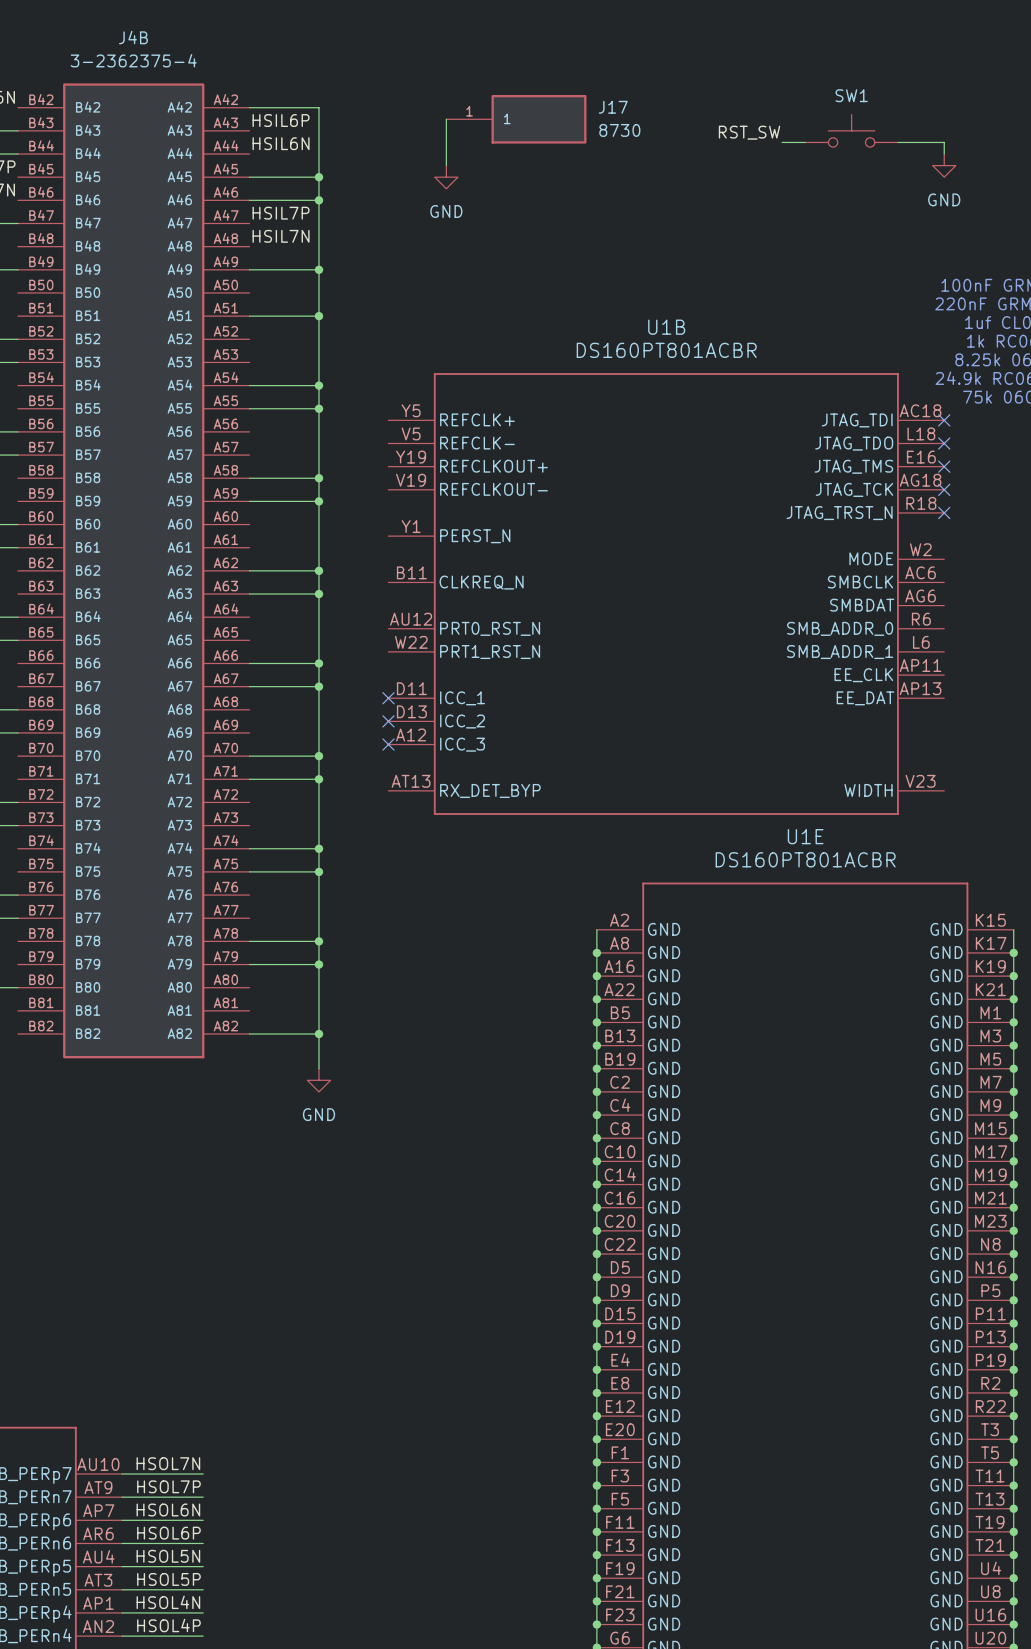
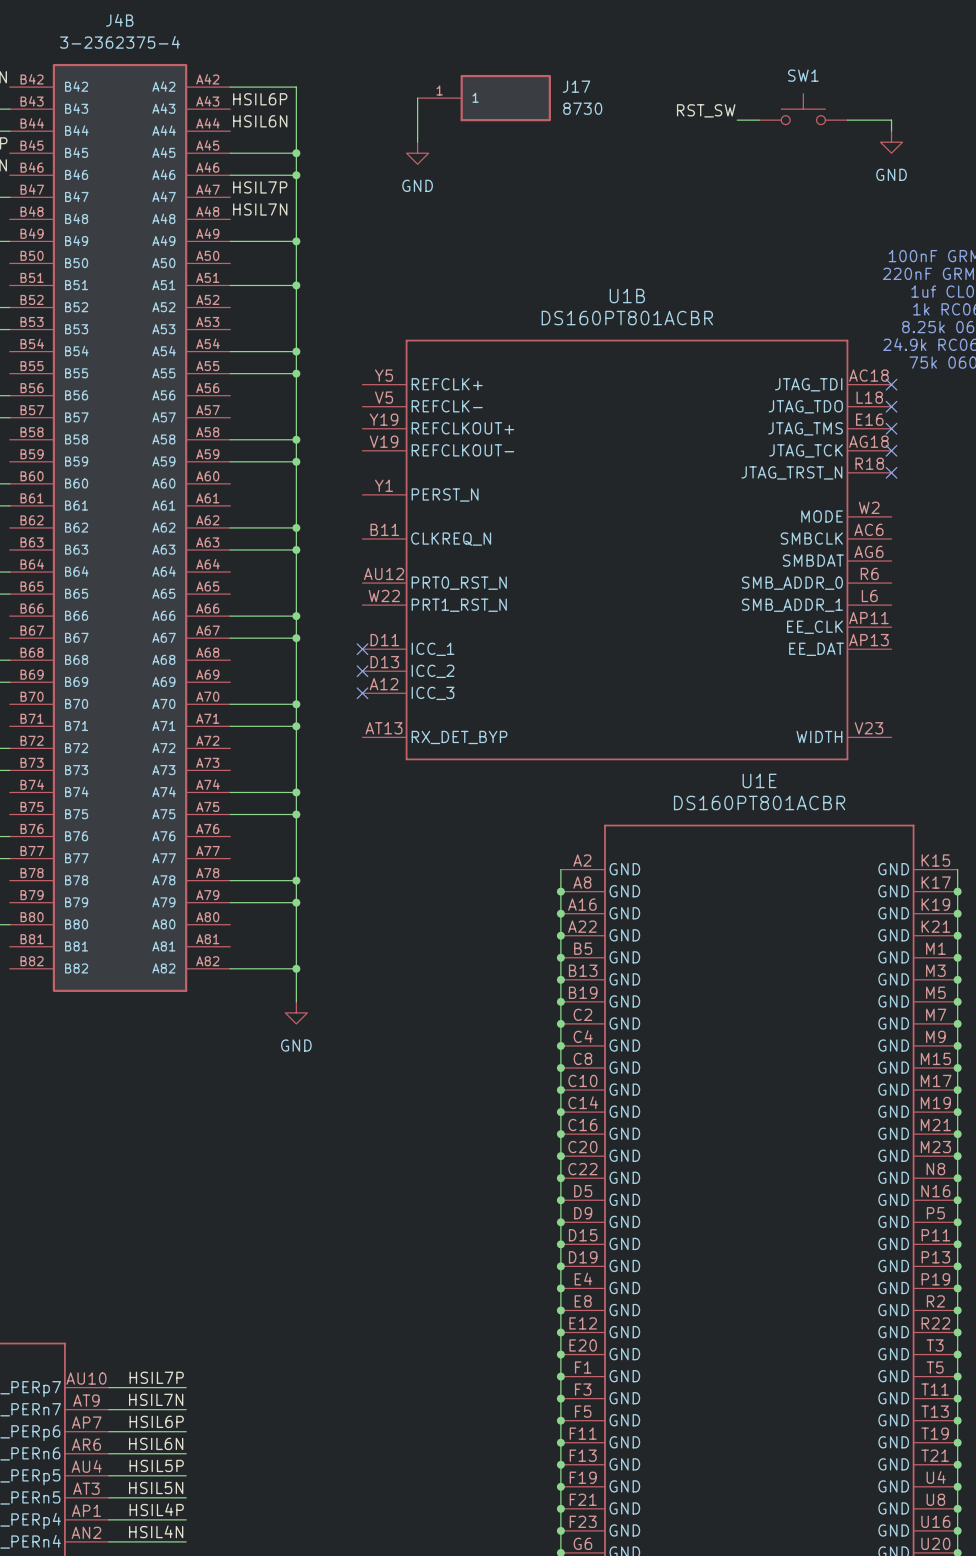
label: HSOL7N (168, 1463) -> HSIL7P (156, 1377)
label: HSOL7P (168, 1486) -> HSIL7N (156, 1399)
label: HSOL6N (168, 1509) -> HSIL6P (156, 1421)
label: HSOL6P (168, 1533) -> HSIL6N (156, 1443)
label: HSOL5N (168, 1556) -> HSIL5P (156, 1465)
label: HSOL5P (168, 1579) -> HSIL5N (156, 1488)
label: HSOL4N (168, 1602) -> HSIL4P (156, 1509)
label: HSOL4P (168, 1625) -> HSIL4N (156, 1531)

